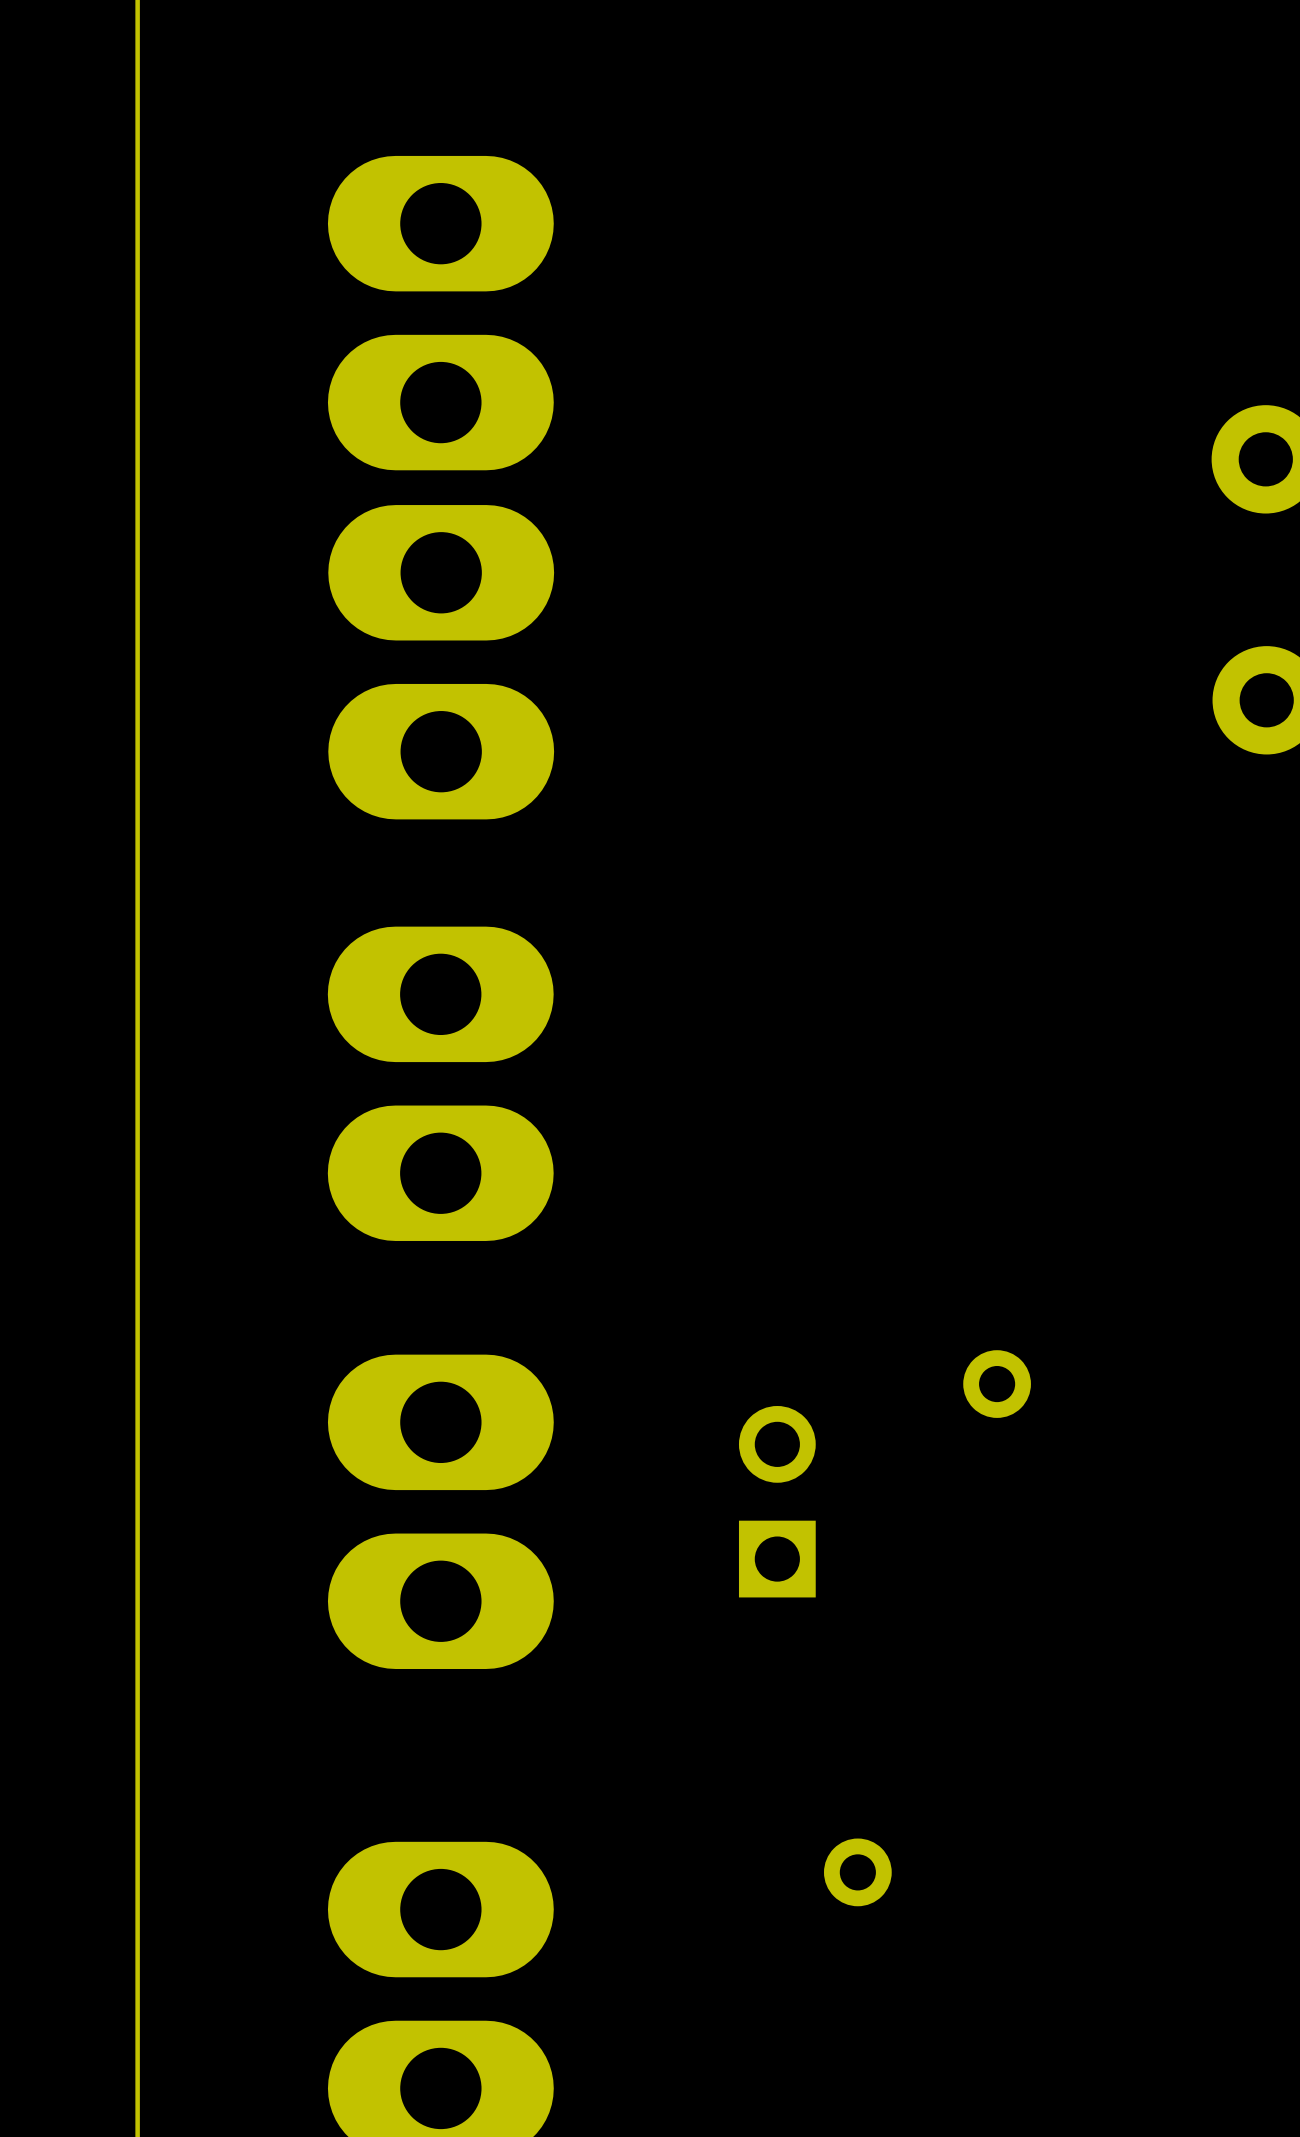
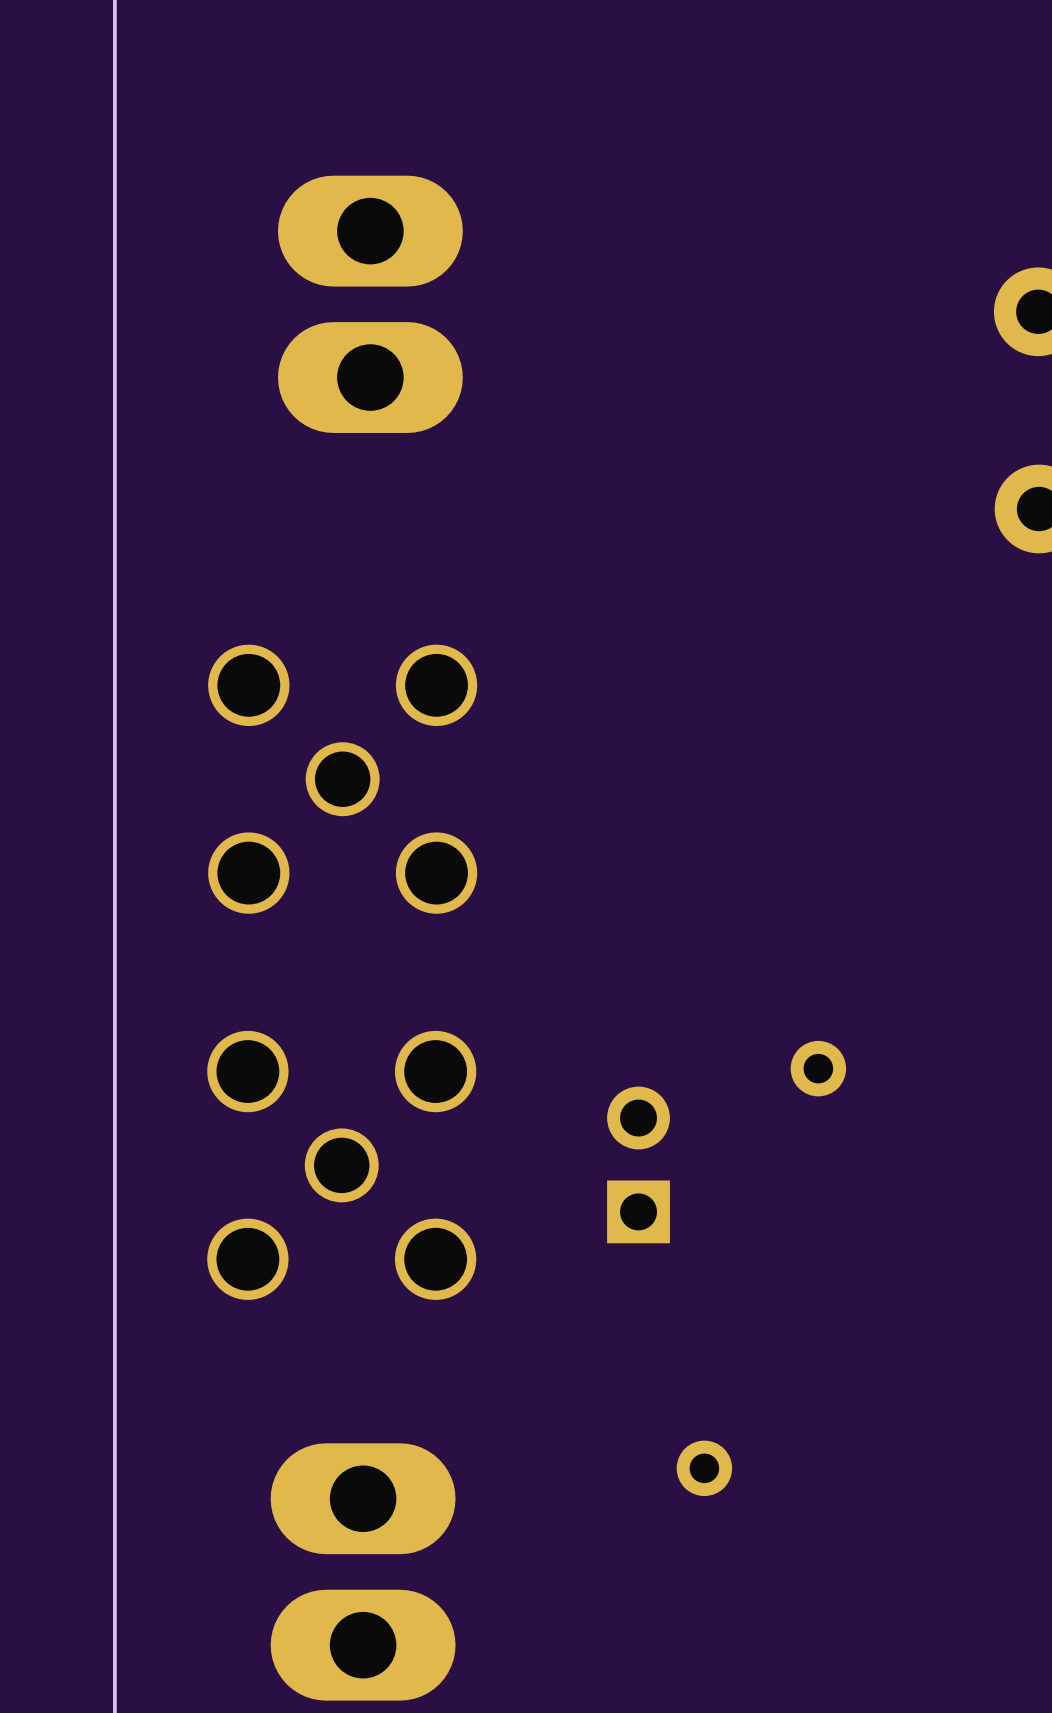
part: (440, 313) -> none
part: none -> (370, 304)
part: (441, 662) -> none
part: none -> (342, 779)
part: (440, 1083) -> none
part footprint: [327, 1354, 554, 1669] -> [207, 1030, 477, 1300]

